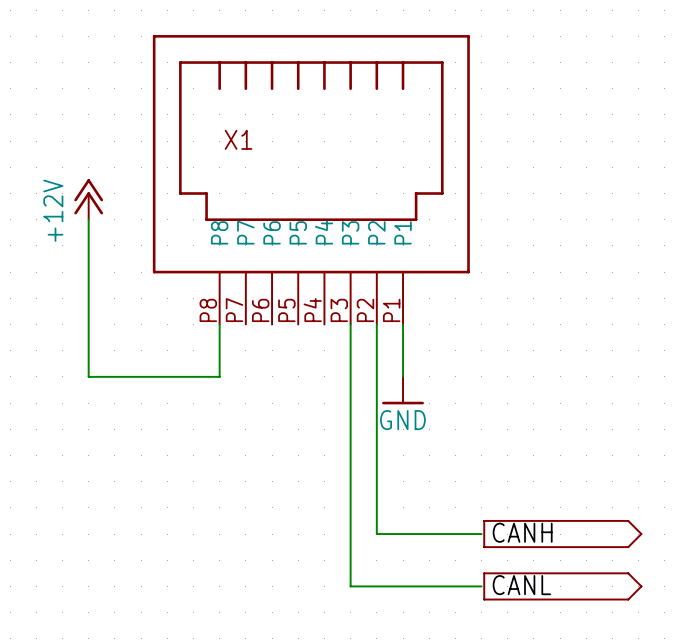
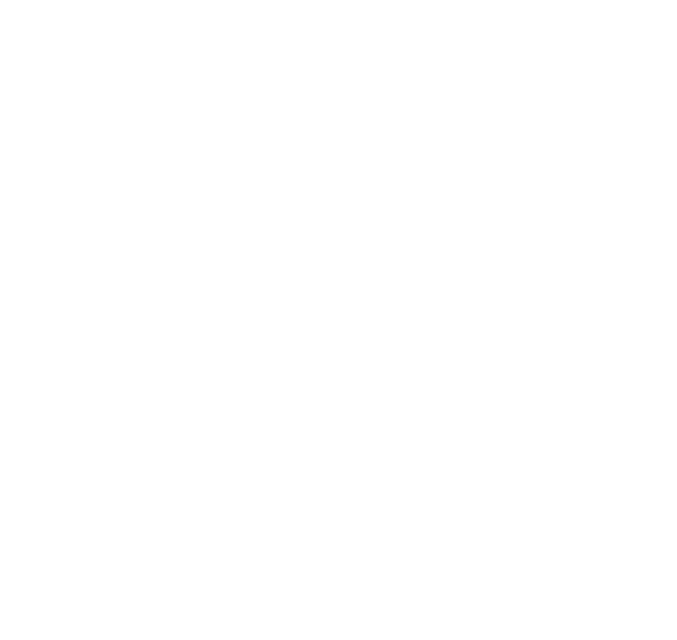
X1: (311, 179) -> none
power symbol: +12V (88, 199) -> none
wire: (88, 219) (88, 376) (219, 376) (219, 324) -> none
wire: (350, 324) (350, 586) (481, 586) -> none
wire: (376, 324) (376, 534) (481, 534) -> none
wire: (403, 324) (403, 376) -> none
power symbol: GND (403, 390) -> none
label: CANH (522, 532) -> none
part: (562, 534) -> none
label: CANL (521, 585) -> none
part: (562, 586) -> none

